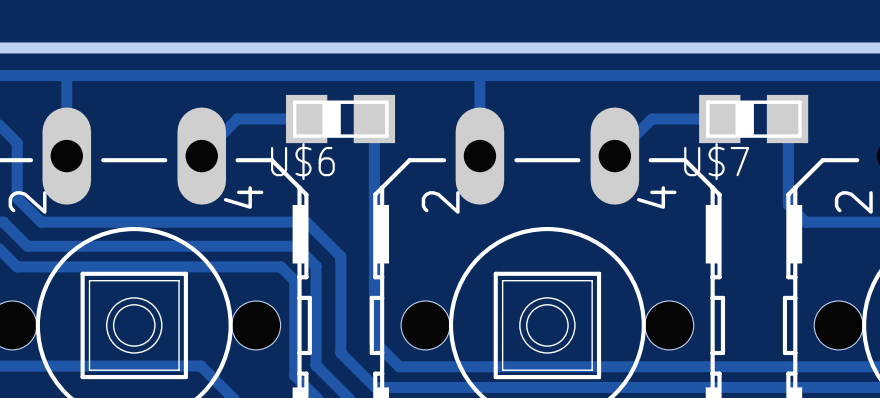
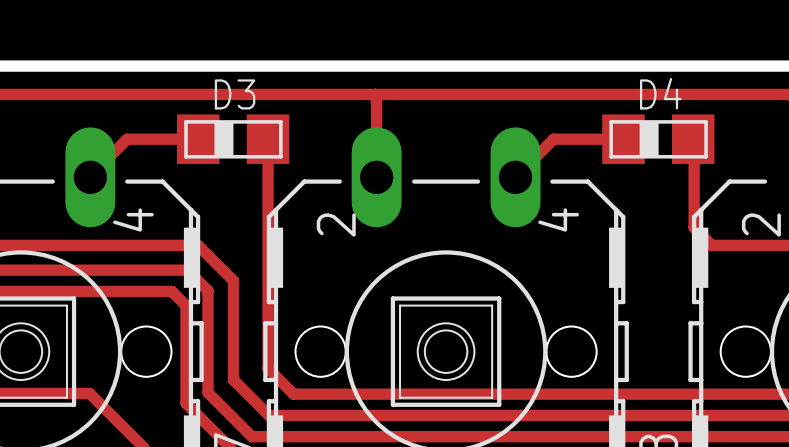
U$6 name: U$6 (302, 161) -> D3 (235, 94)
U$7 name: U$7 (716, 161) -> D4 (660, 93)

